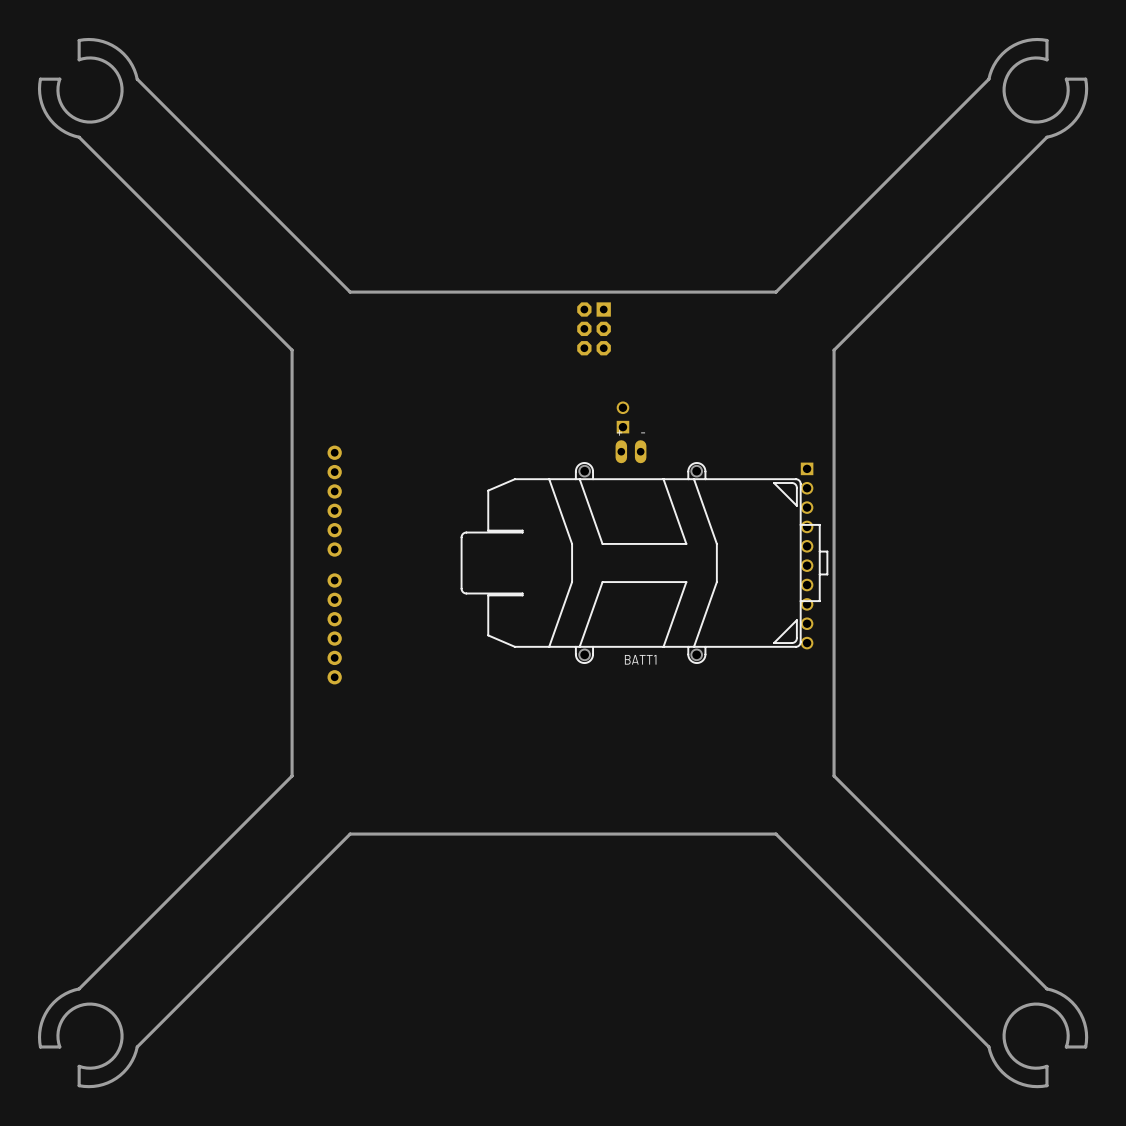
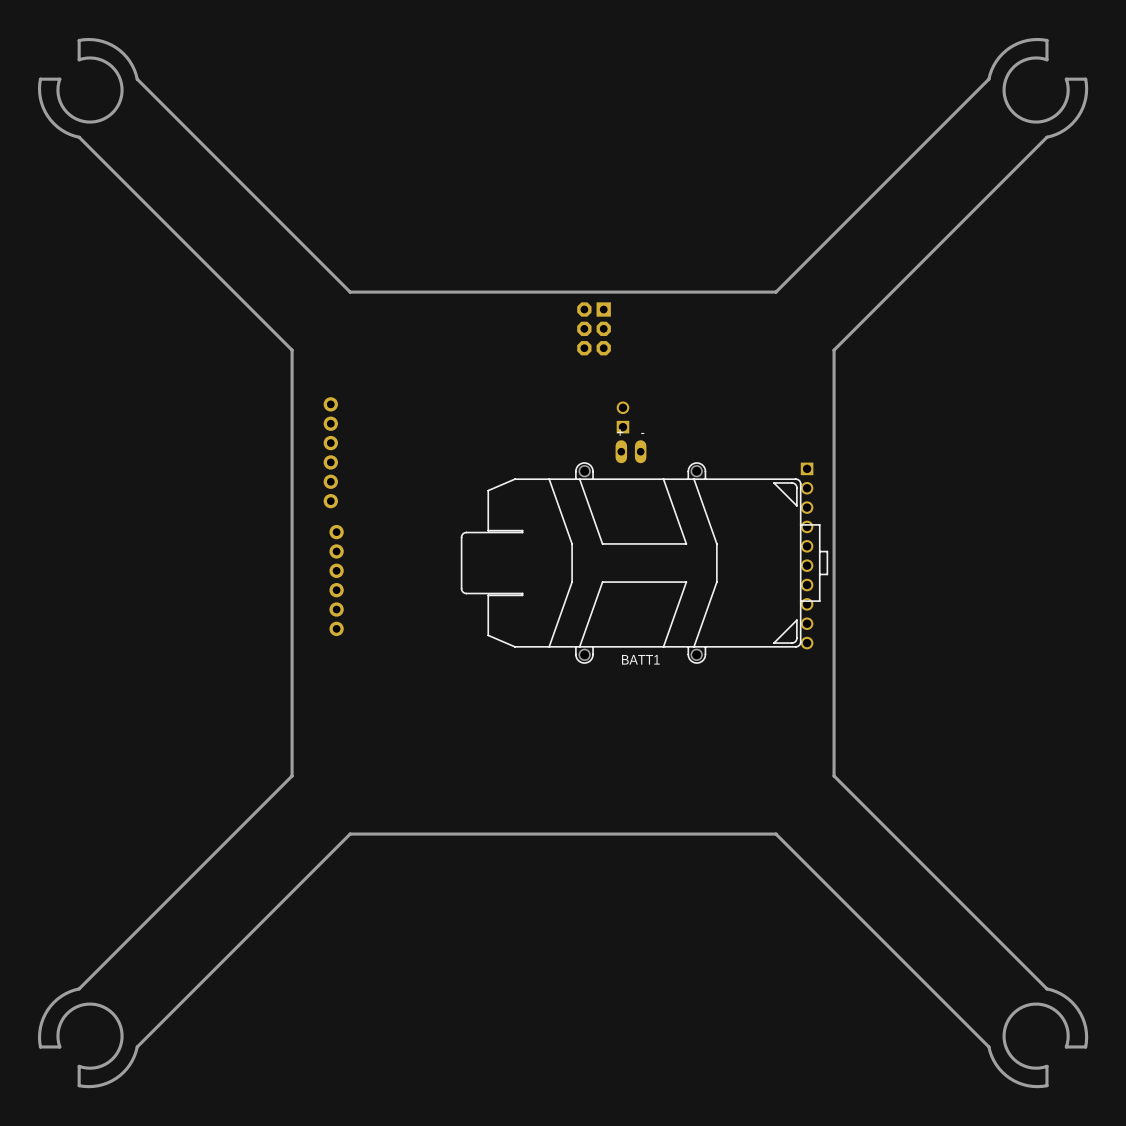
part: none -> (330, 452)
part: (334, 501) -> none
part: none -> (336, 580)
part: (334, 628) -> none

